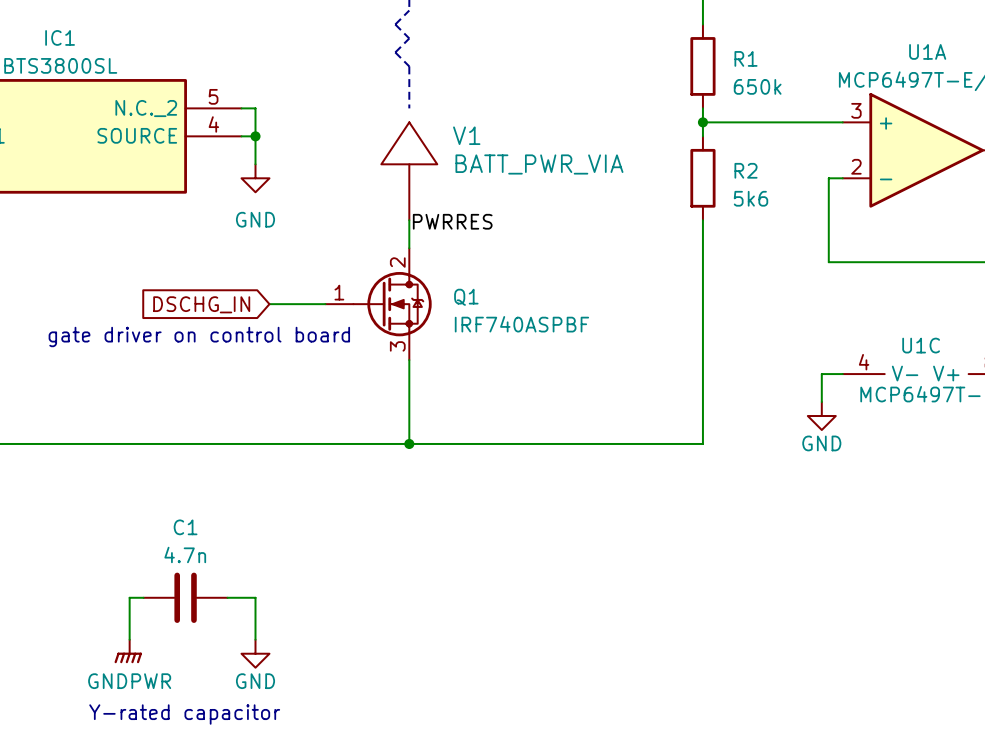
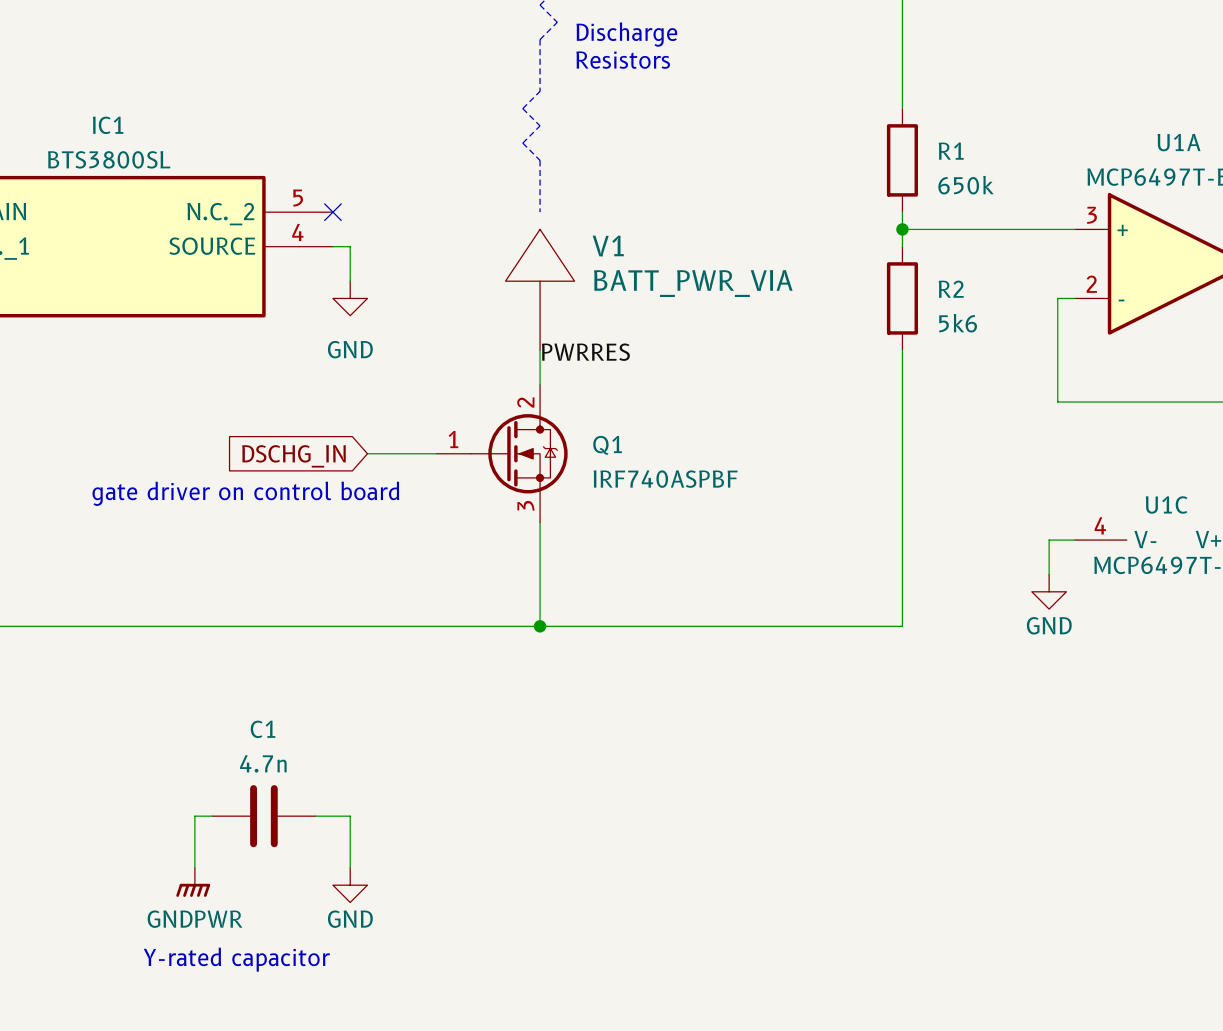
wire: (241, 108) (255, 108) (255, 136) -> none
no-connect mark: none -> (332, 212)
junction: (255, 136) -> none

